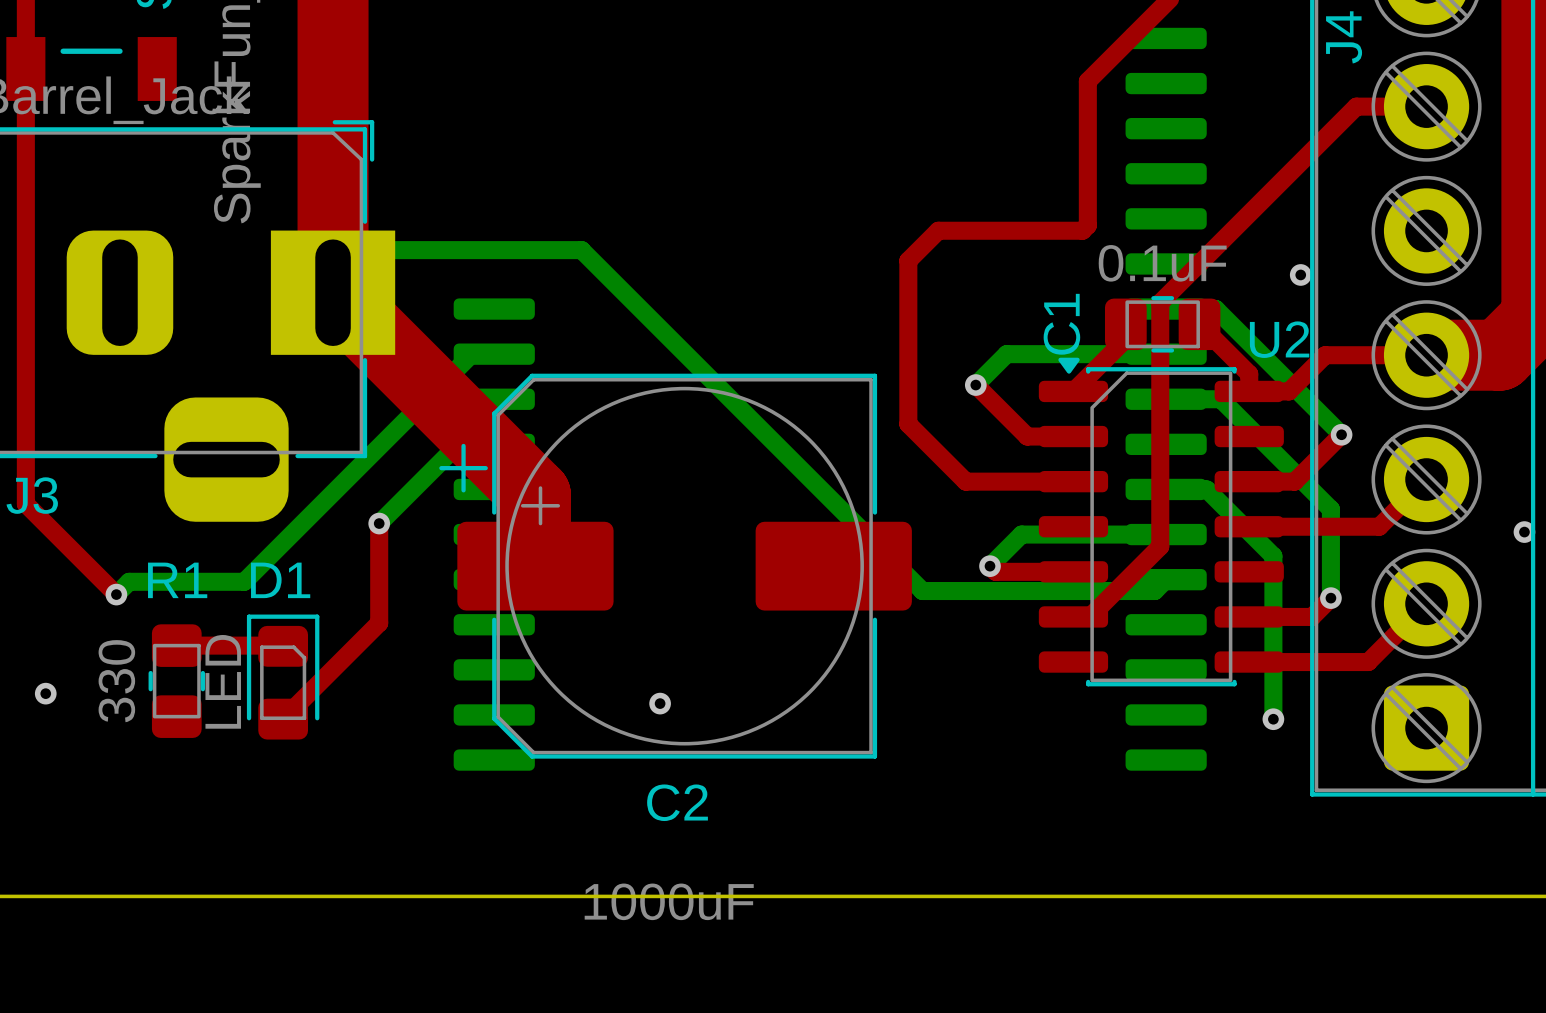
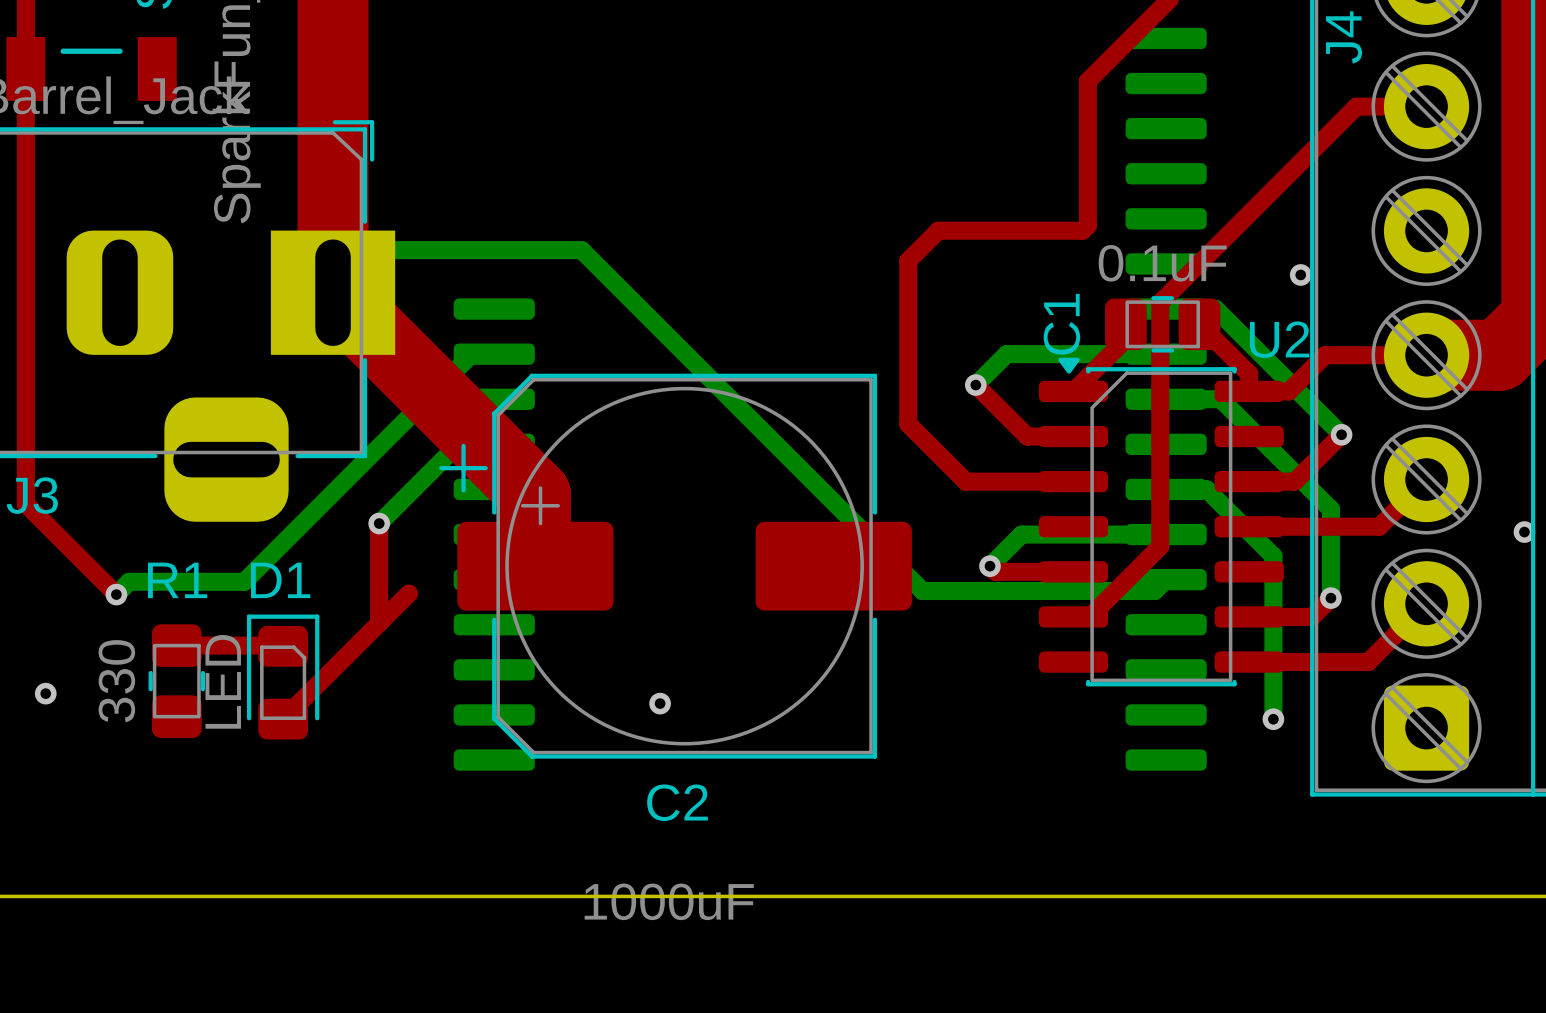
top track: (379, 623) (283, 719) -> (409, 593) (283, 719)

